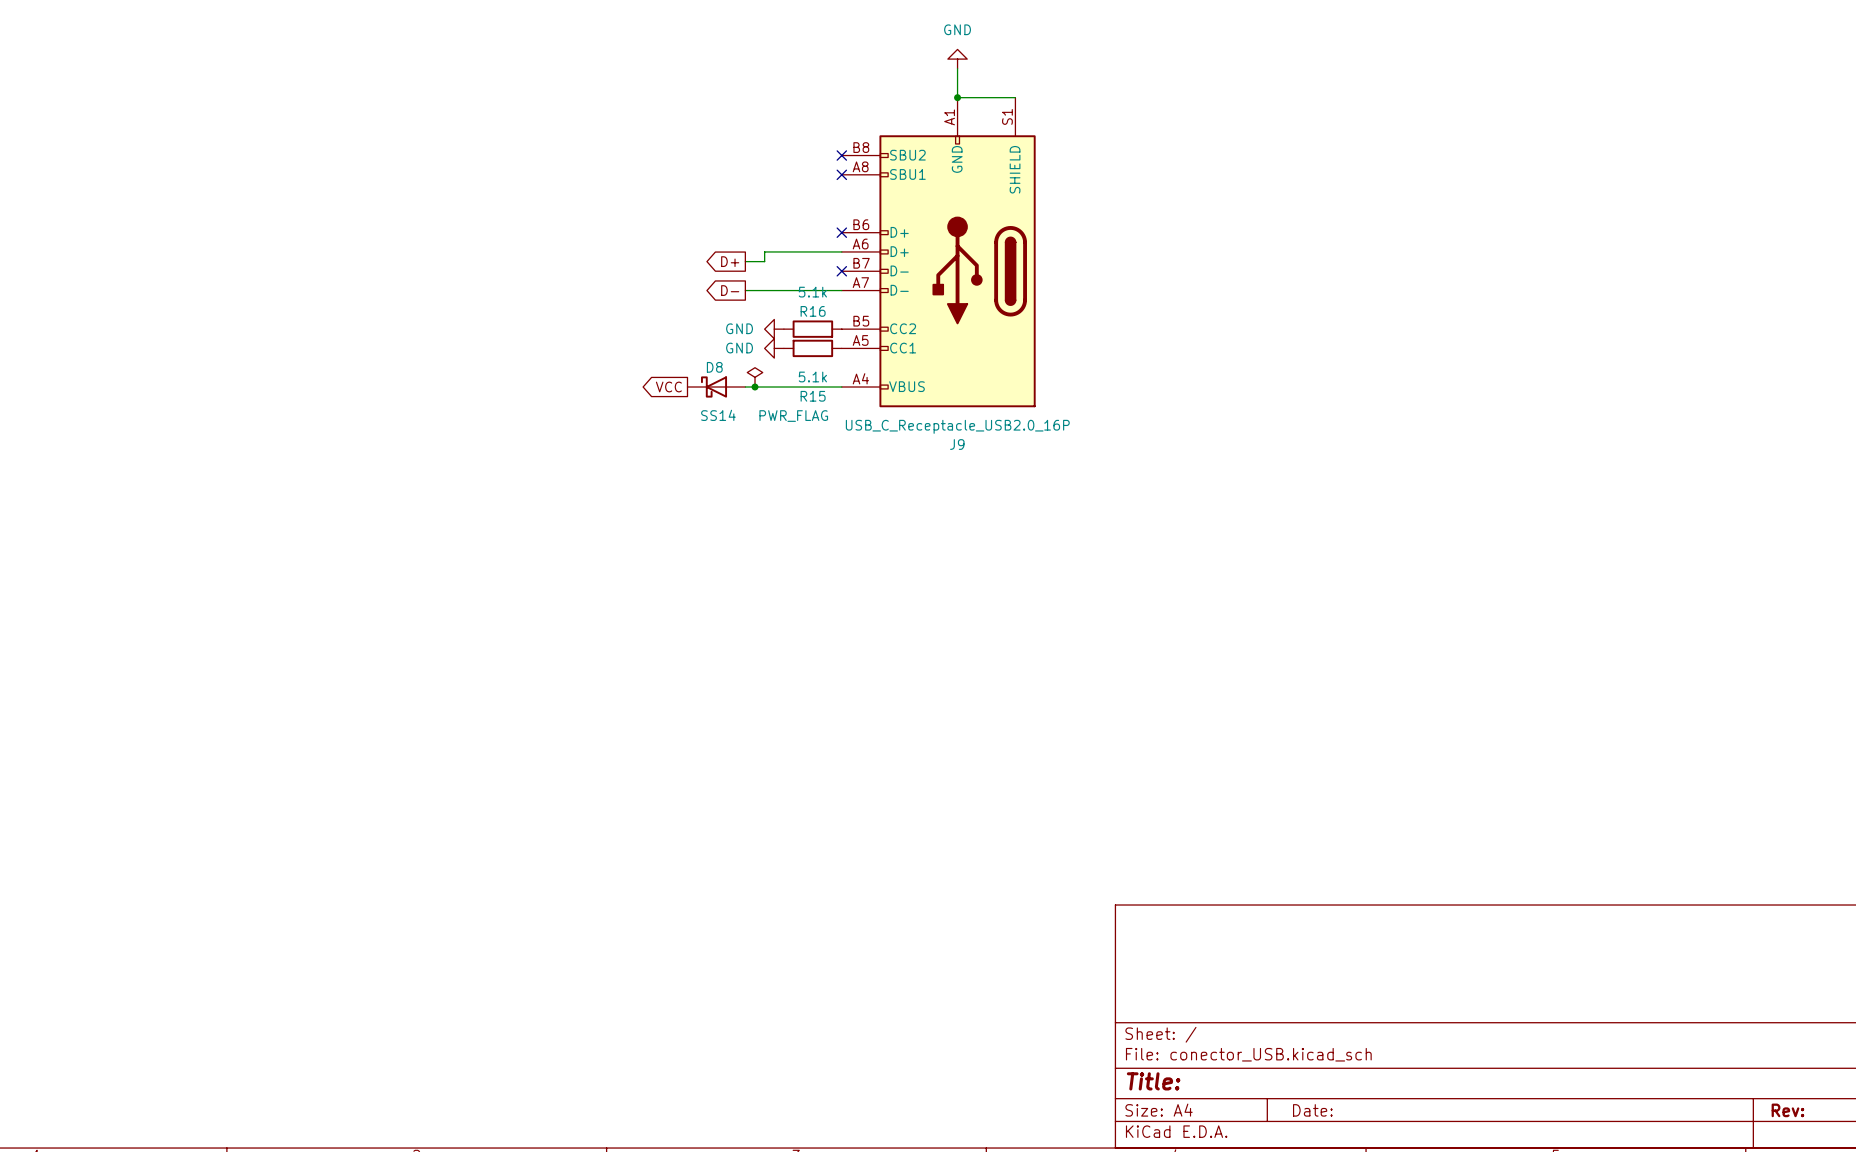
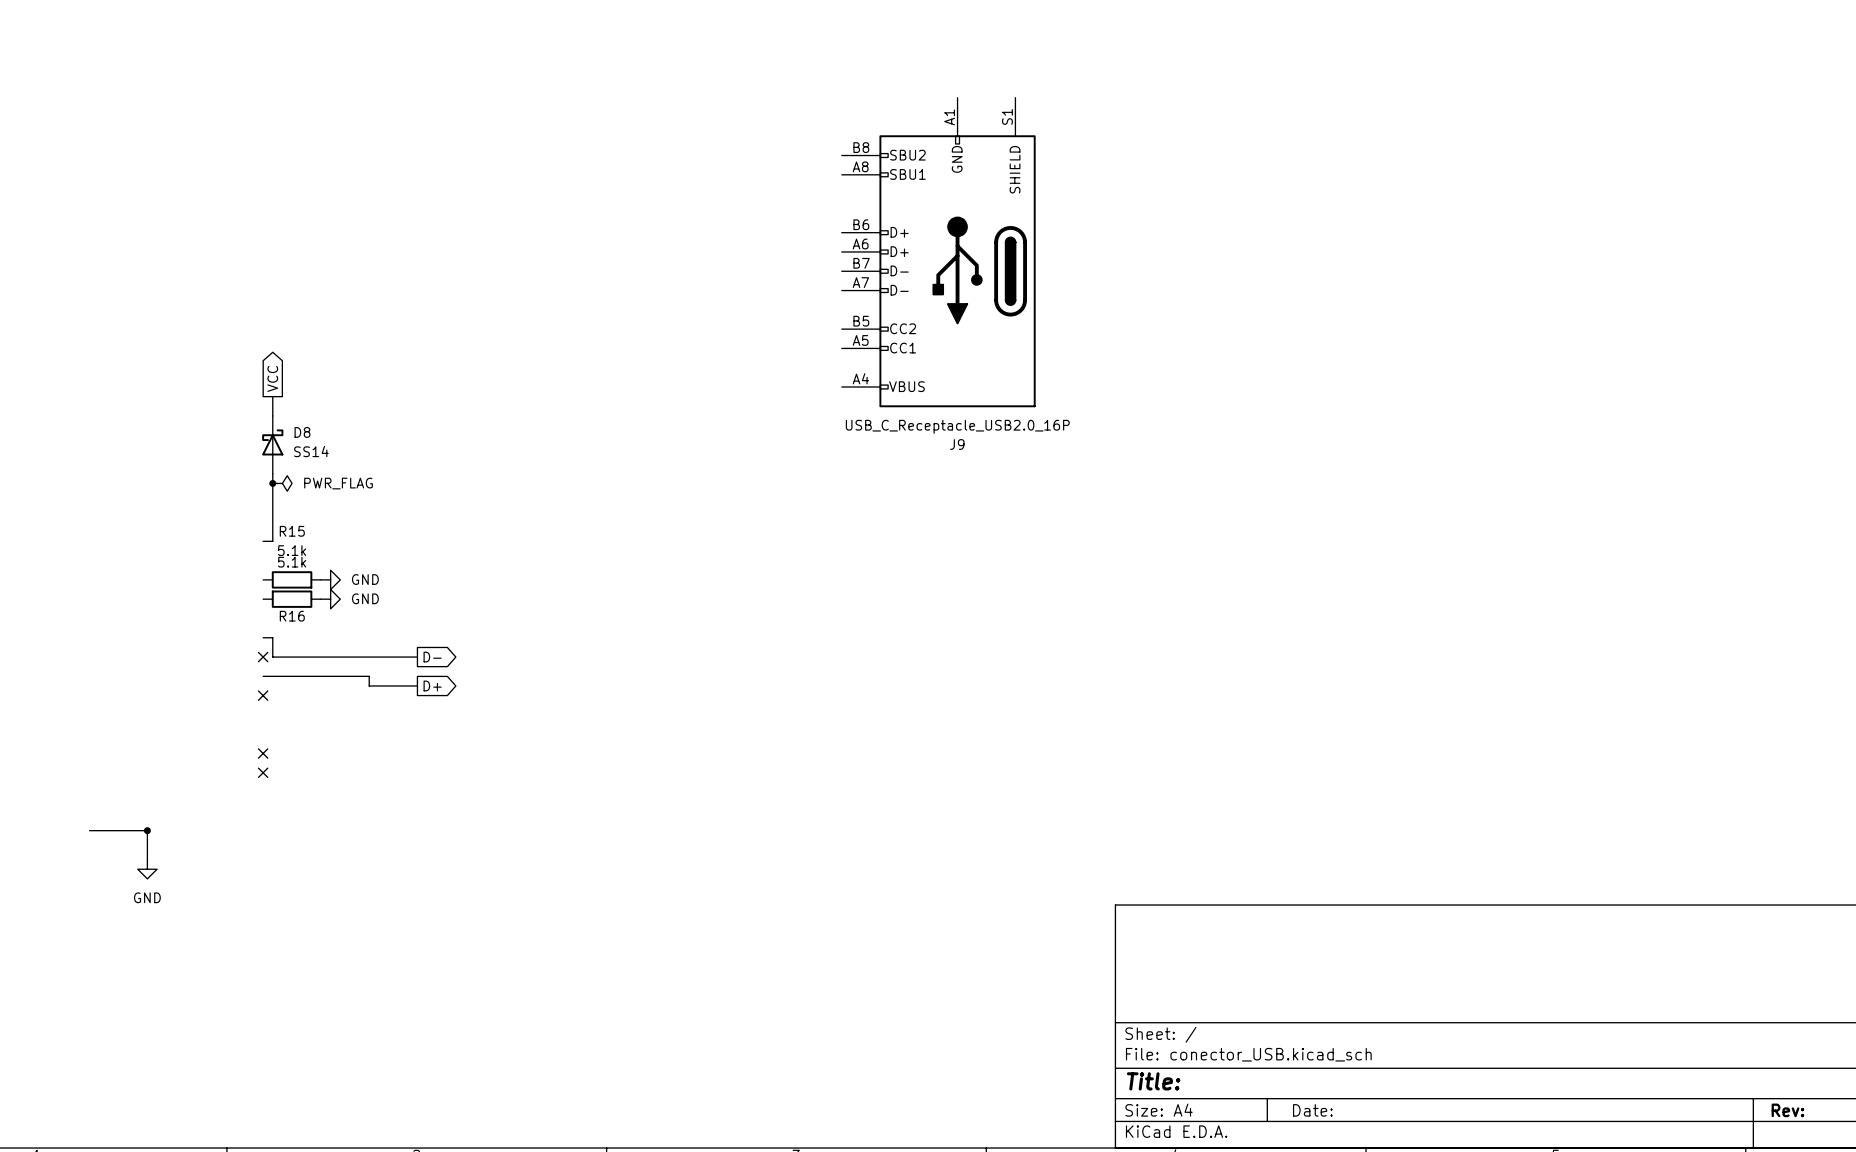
power symbol: GND (957, 59) -> none
wire: (957, 68) (957, 97) (1015, 97) -> none
junction: (957, 97) -> none
no-connect mark: (841, 155) -> none
no-connect mark: (841, 174) -> none
no-connect mark: (841, 232) -> none
wire: (841, 251) (764, 251) (764, 261) (745, 261) -> none
global label: D+ (730, 261) -> none
no-connect mark: (841, 271) -> none
global label: D- (730, 290) -> none
wire: (745, 290) (841, 290) -> none
R16 name position: R16 (813, 311) -> R16 (292, 616)
power symbol: GND (774, 329) -> none
R16 position: (812, 329) -> (292, 599)
power symbol: GND (774, 348) -> none
R15 position: (812, 348) -> (292, 579)
D8 name position: D8 (714, 367) -> D8 (302, 432)
R15 value position: 5.1k (812, 376) -> 5.1k (292, 550)
power symbol: PWR_FLAG (755, 377) -> none
global label: none -> VCC (272, 378)
global label: VCC (668, 387) -> none
D8 rotation: 0° (714, 387) -> 90° clockwise (272, 442)
D8 position: (716, 387) -> (272, 444)
wire: (745, 387) (841, 387) -> none
junction: (755, 387) -> none
wire: none -> (272, 396) (272, 415)
R15 name position: R15 (813, 396) -> R15 (292, 531)
D8 value position: SS14 (718, 415) -> SS14 (311, 451)
wire: none -> (272, 473) (272, 541) (263, 541)
junction: none -> (272, 483)
power symbol: none -> PWR_FLAG (282, 483)
power symbol: none -> GND (330, 579)
power symbol: none -> GND (330, 599)
wire: none -> (263, 637) (272, 637) (272, 657) (417, 657)
no-connect mark: none -> (263, 657)
global label: none -> D- (432, 657)
wire: none -> (263, 676) (369, 676) (369, 685) (417, 685)
global label: none -> D+ (432, 685)
no-connect mark: none -> (263, 695)
no-connect mark: none -> (263, 753)
no-connect mark: none -> (263, 772)
wire: none -> (89, 830) (147, 830) (147, 859)
junction: none -> (147, 830)
power symbol: none -> GND (147, 869)

